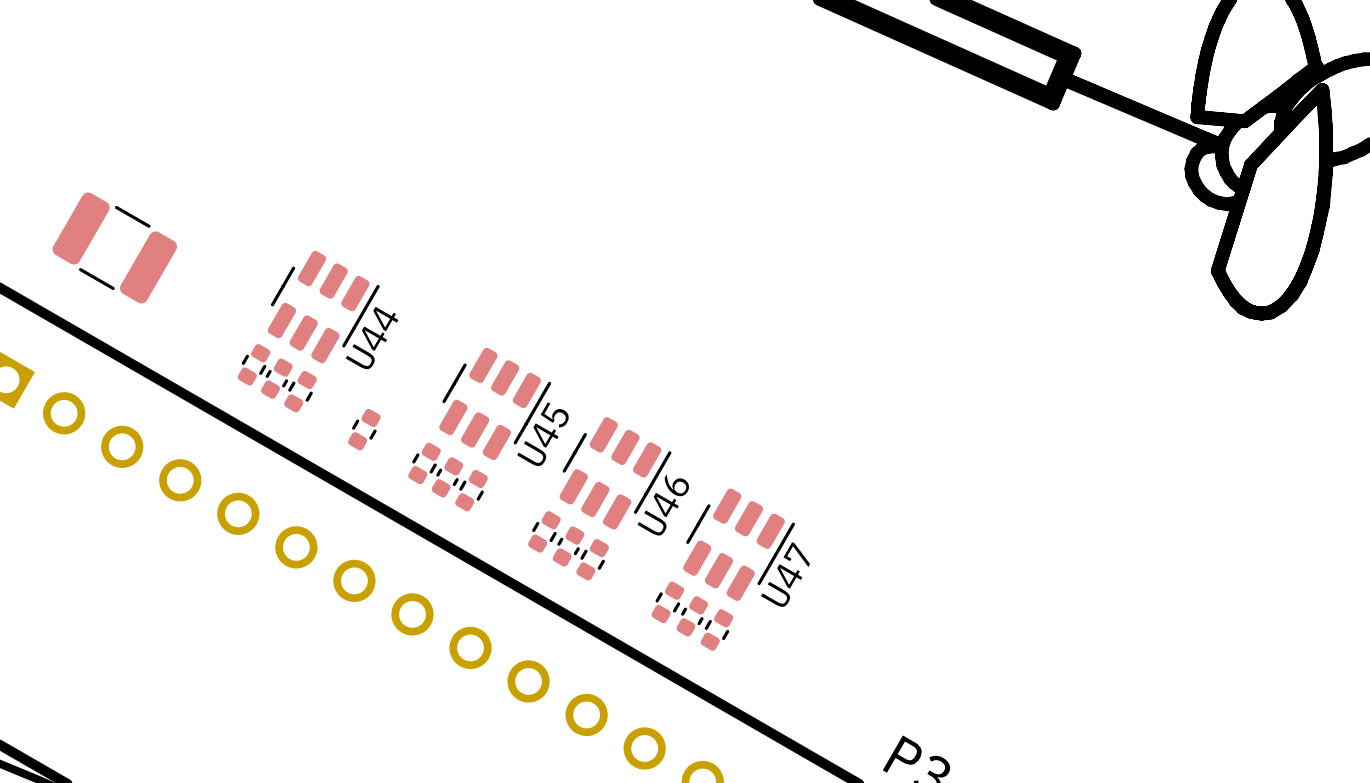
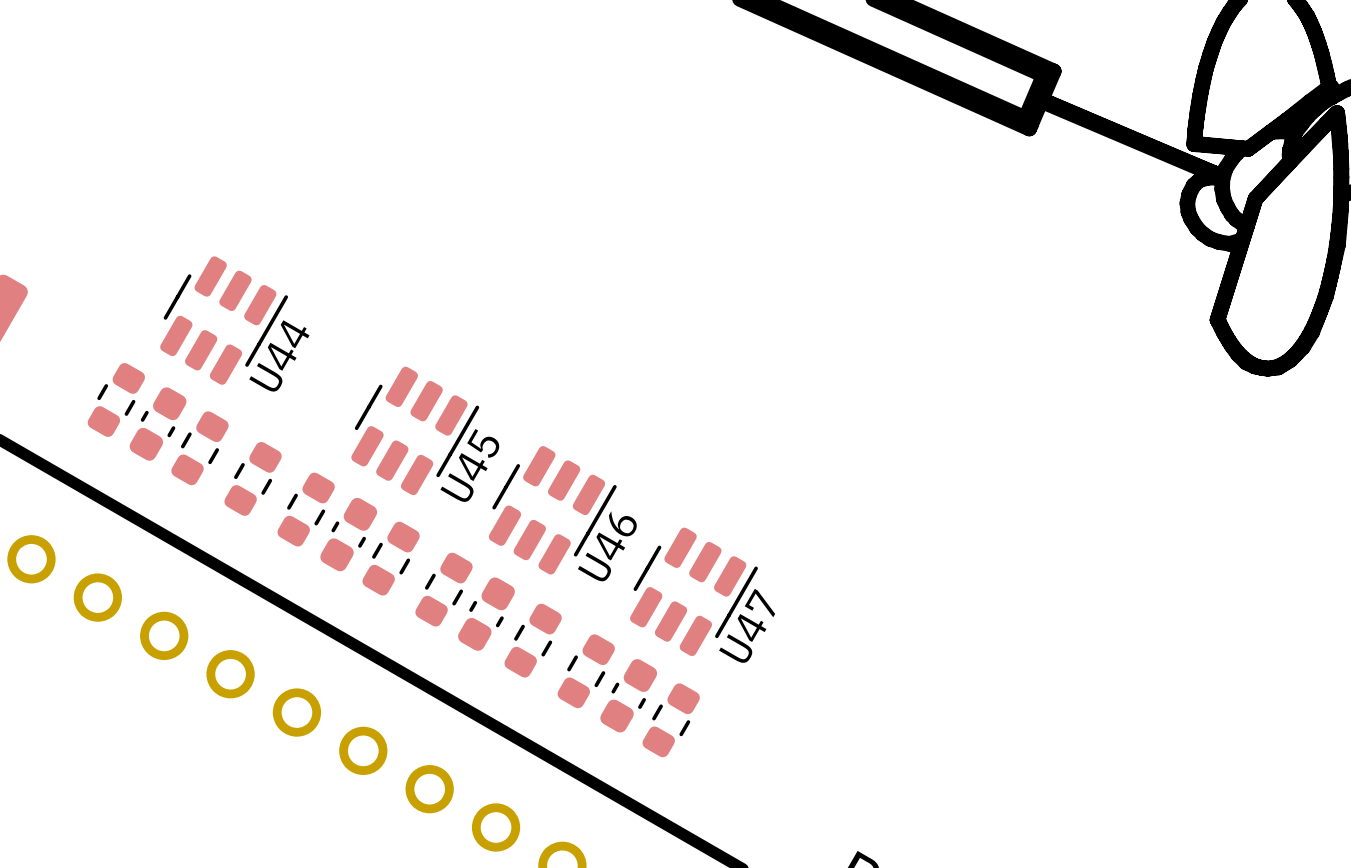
U44 position: (323, 307) -> (224, 320)
part: none -> (116, 400)
part: none -> (158, 424)
part: (254, 364) -> none
part: (276, 378) -> none
part: none -> (199, 448)
part: (300, 391) -> none
U45 position: (495, 403) -> (415, 430)
part footprint: [348, 408, 381, 451] -> [224, 441, 282, 516]
part: none -> (306, 509)
part: none -> (348, 534)
part: (424, 463) -> none
U46 position: (615, 473) -> (552, 510)
part: (447, 477) -> none
part: none -> (391, 558)
part: (471, 490) -> none
part: none -> (444, 589)
part: none -> (486, 614)
part: (544, 531) -> none
U47 position: (739, 544) -> (693, 591)
part: (568, 546) -> none
part: none -> (533, 640)
part: (592, 559) -> none
part: none -> (586, 671)
part: none -> (628, 695)
part: (667, 602) -> none
part: (692, 616) -> none
part: none -> (671, 720)
part: (716, 630) -> none

